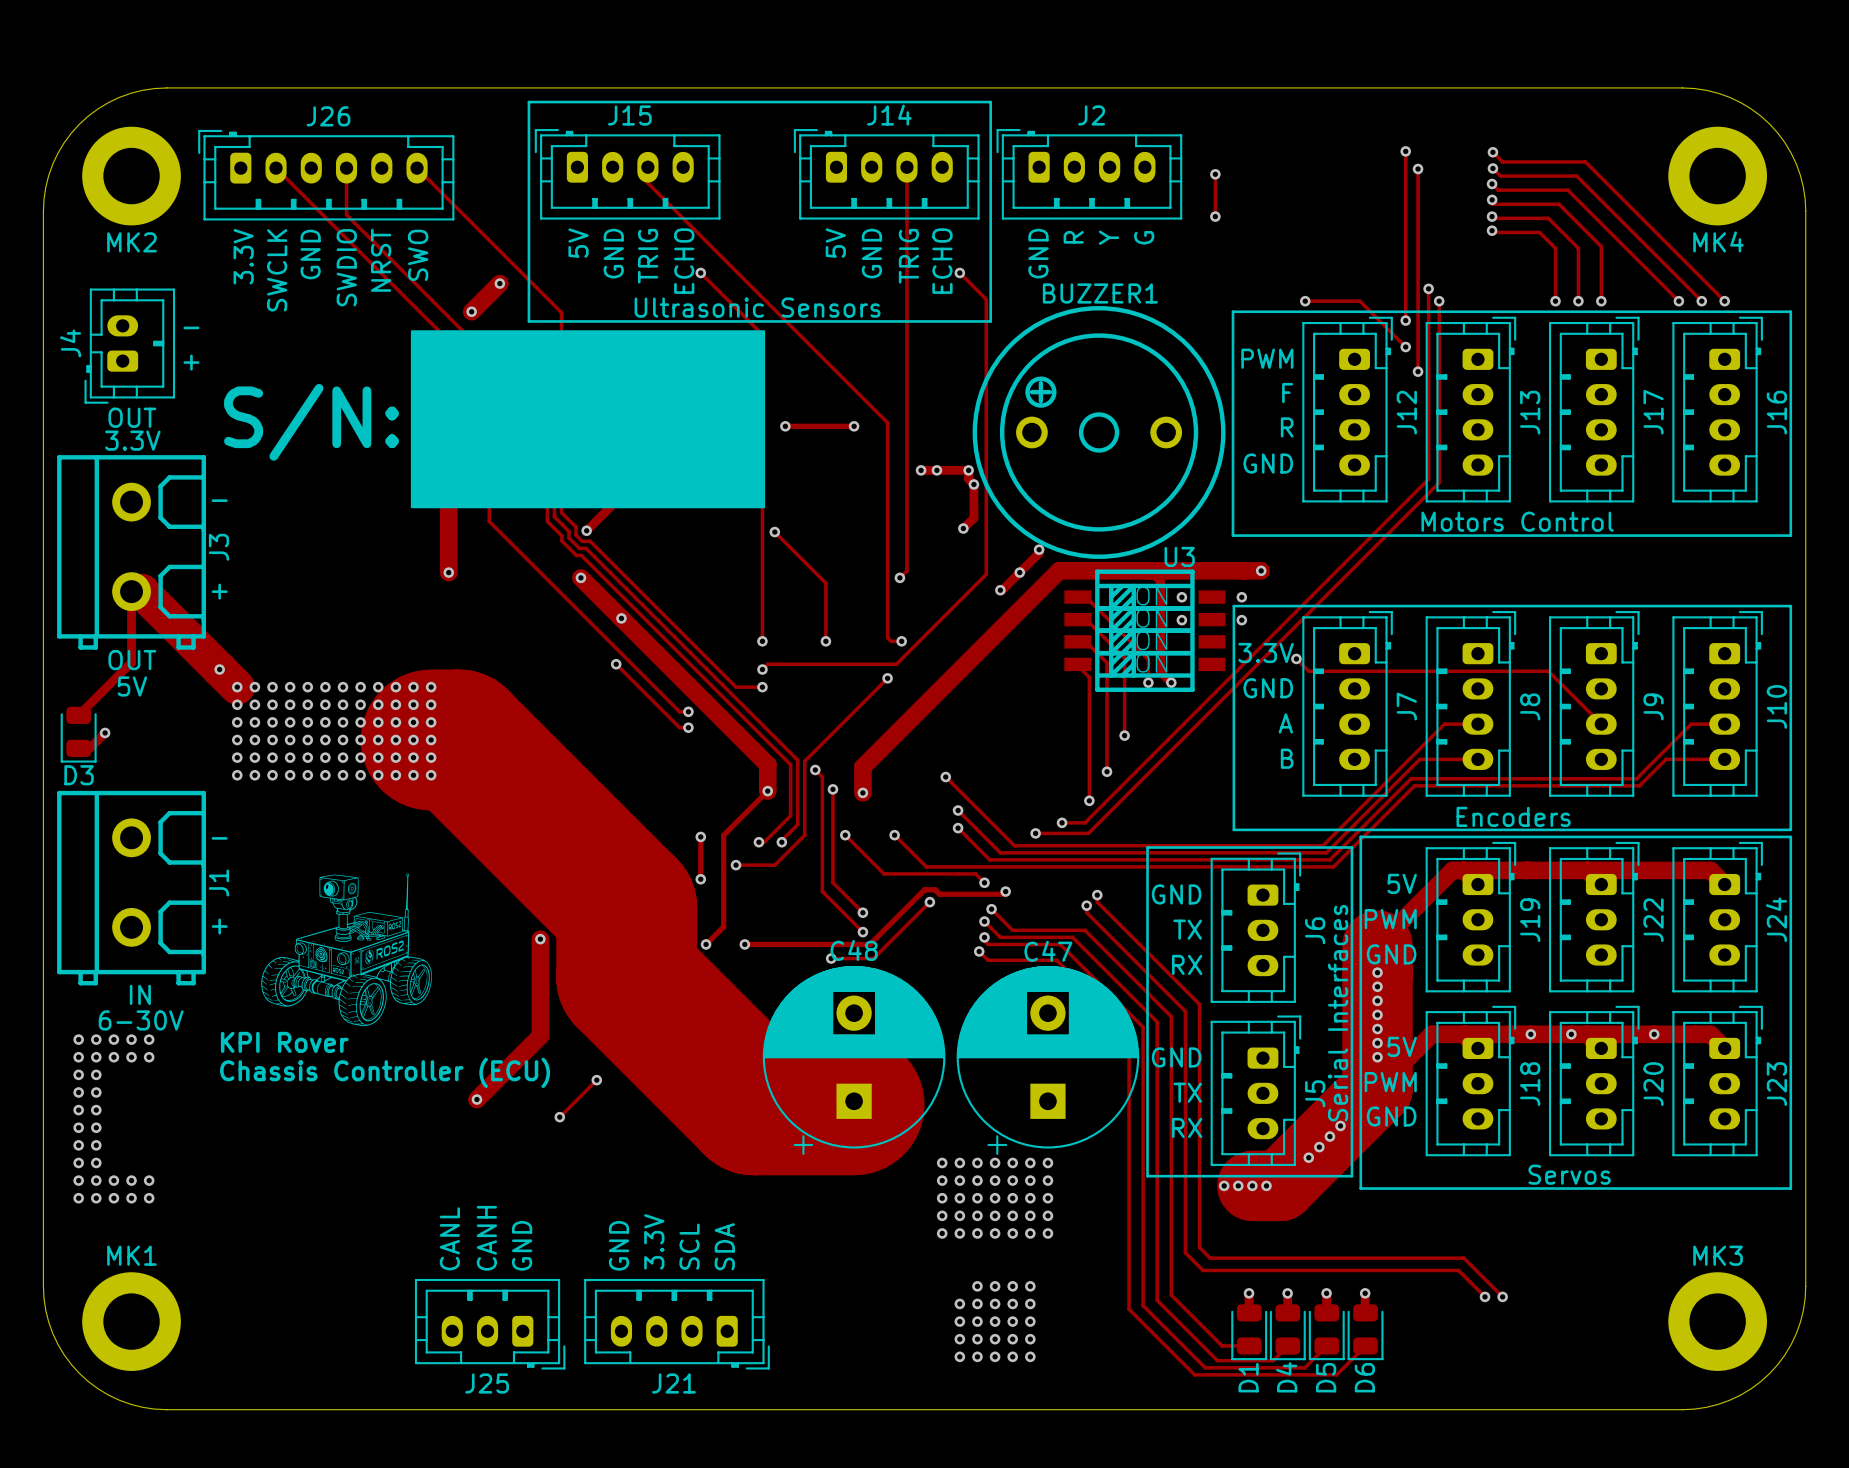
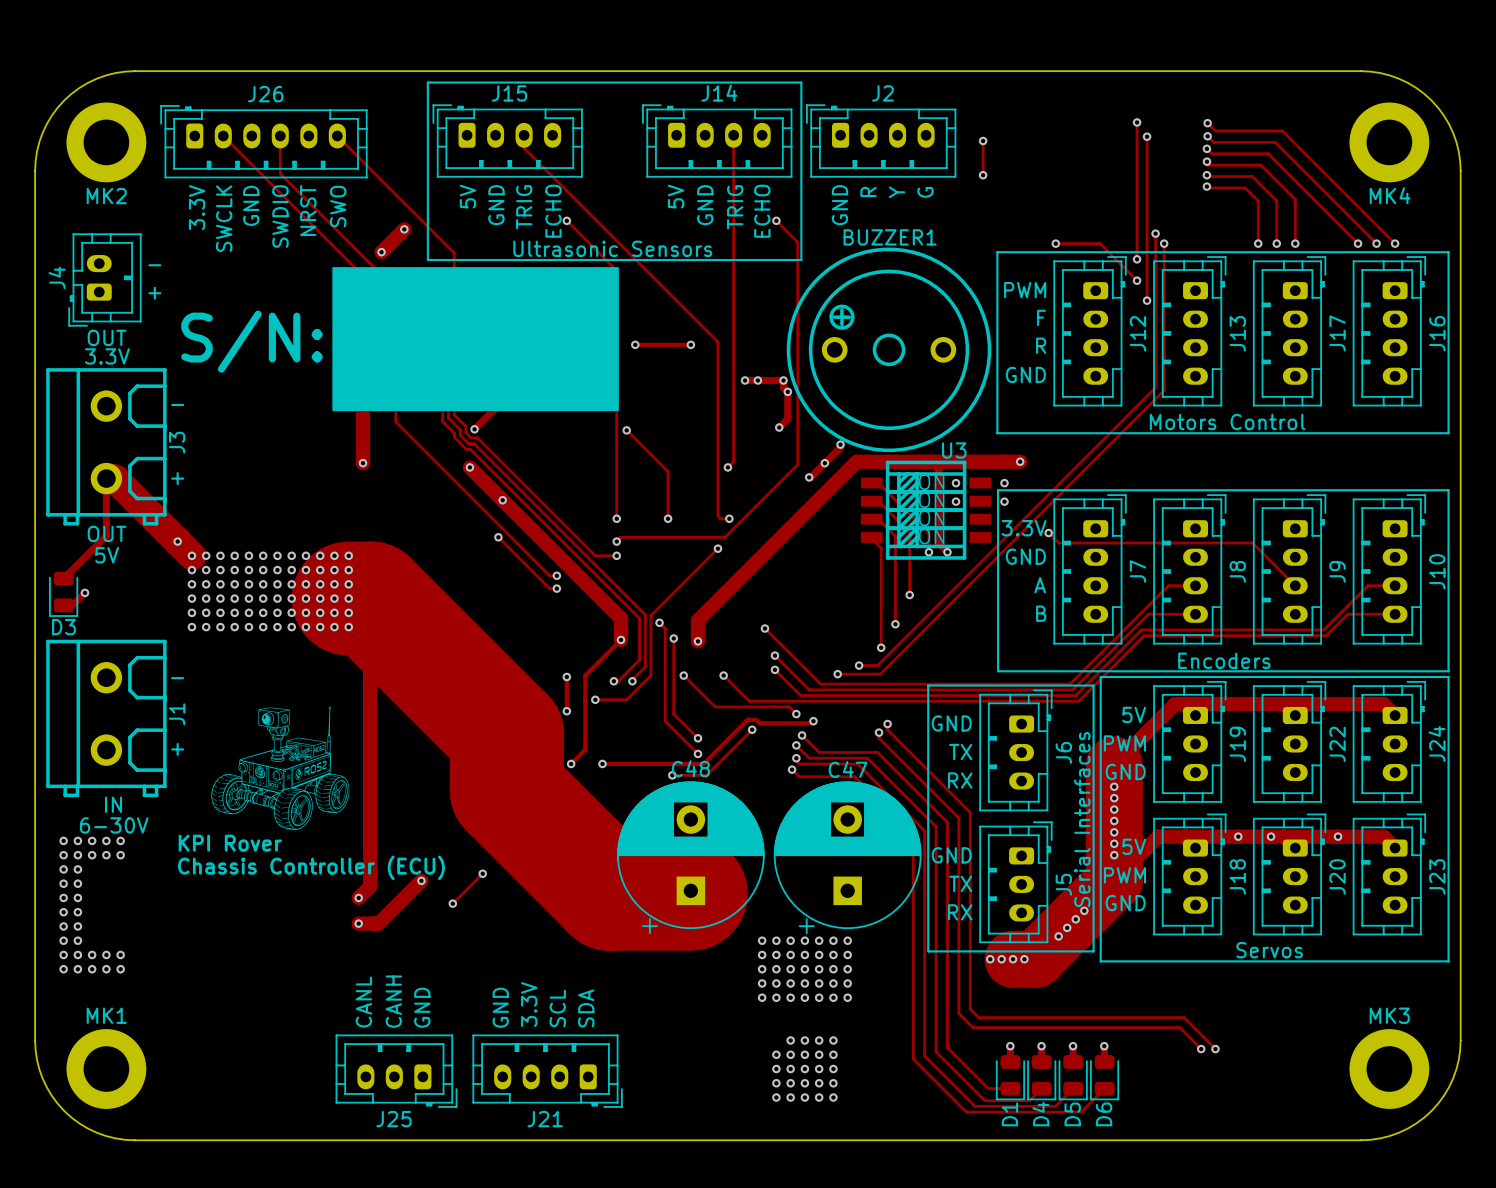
track: none -> (348, 627) (370, 648) (370, 886) (358, 897)
track: (540, 939) (540, 1036) (476, 1099) -> none
via: (540, 939) -> none
track: none -> (421, 880) (378, 923) (358, 923)
via: none -> (421, 880)
via: (476, 1099) -> none
via: none -> (358, 897)
via: none -> (358, 923)

